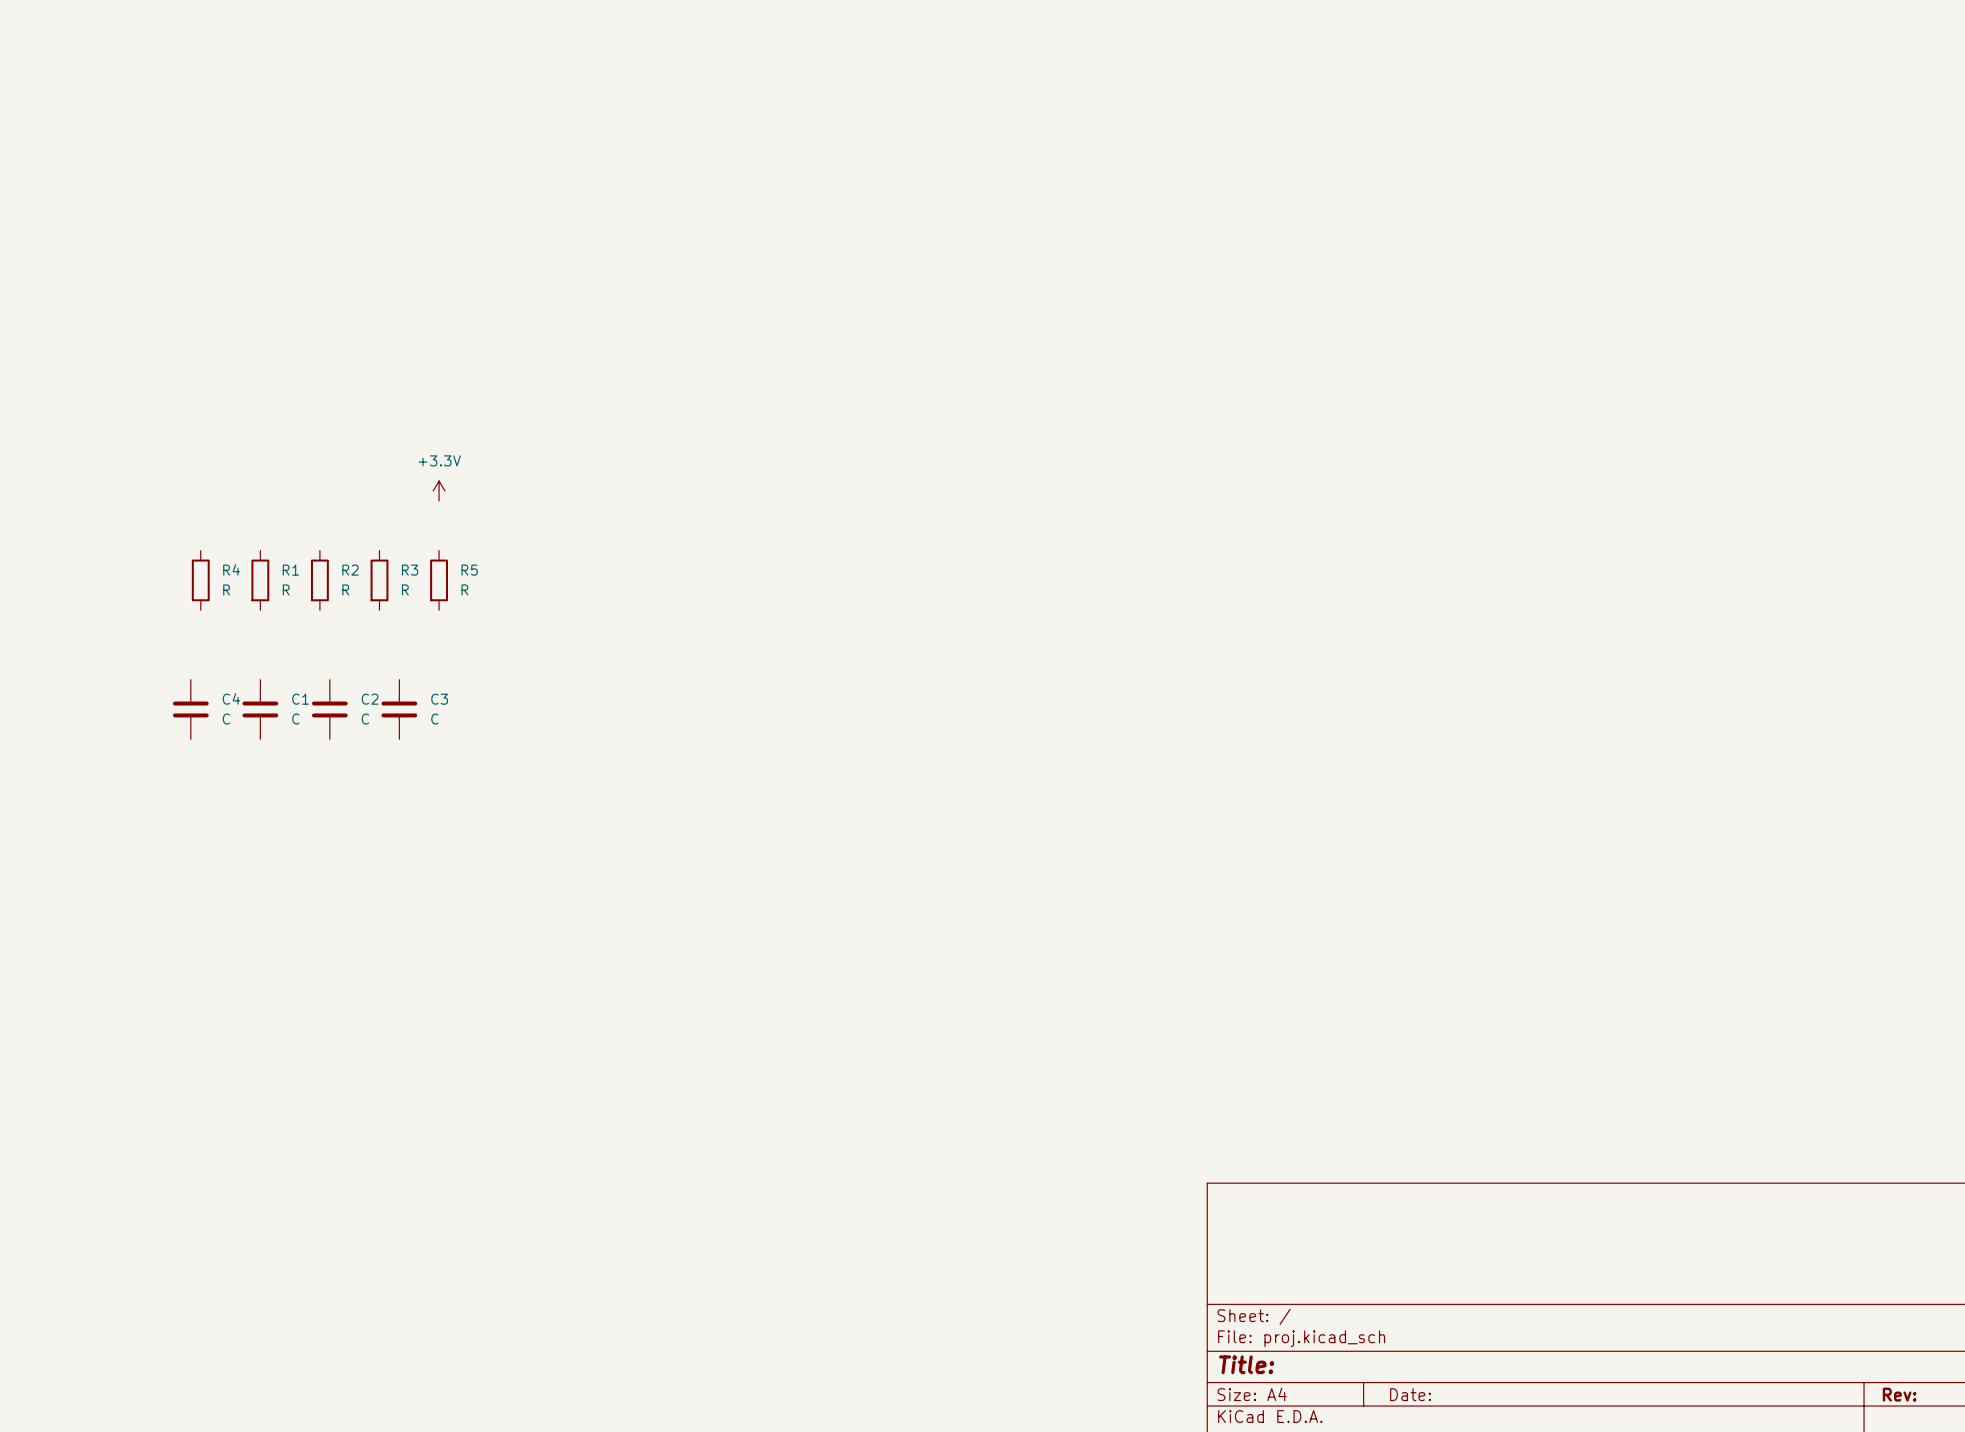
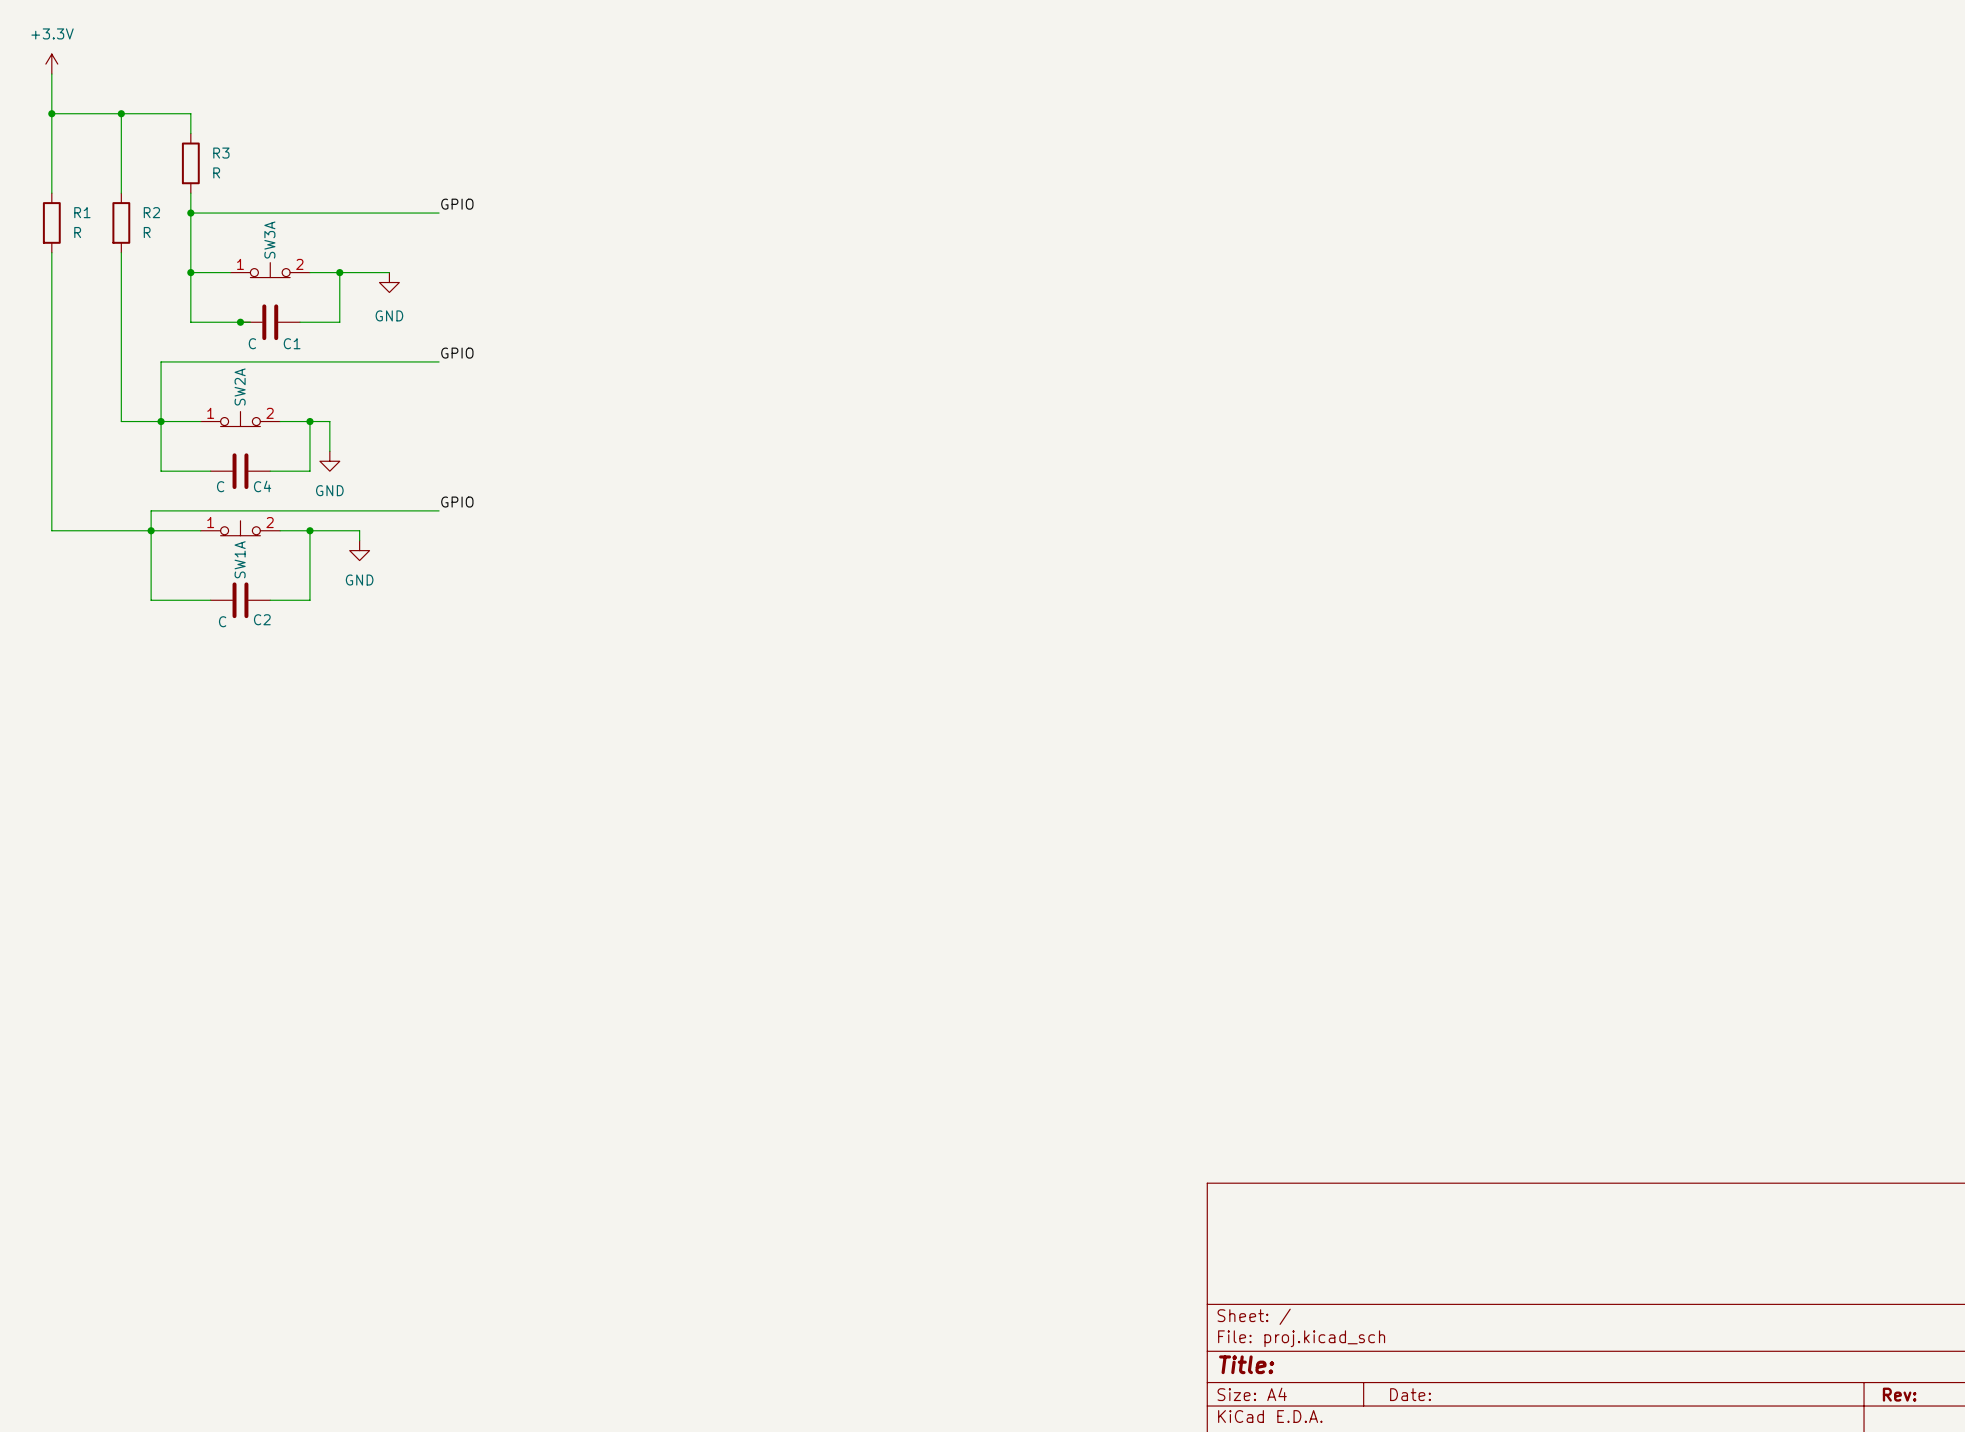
power symbol: none -> +3.3V (51, 64)
wire: none -> (51, 74) (51, 193)
wire: none -> (51, 113) (190, 113) (190, 133)
junction: none -> (51, 113)
wire: none -> (121, 113) (121, 193)
junction: none -> (121, 113)
wire: none -> (190, 193) (190, 322) (250, 322)
label: none -> GPIO (457, 204)
wire: none -> (190, 213) (439, 213)
junction: none -> (190, 213)
wire: none -> (51, 252) (51, 530) (200, 530)
wire: none -> (121, 252) (121, 421) (200, 421)
SW3A: none -> (270, 270)
wire: none -> (190, 272) (230, 272)
junction: none -> (190, 272)
wire: none -> (309, 272) (389, 272)
wire: none -> (339, 272) (339, 322) (300, 322)
junction: none -> (339, 272)
power symbol: none -> GND (389, 282)
junction: none -> (240, 322)
label: none -> GPIO (457, 353)
wire: none -> (439, 361) (161, 361) (161, 471) (210, 471)
SW2A: none -> (240, 419)
junction: none -> (161, 421)
wire: none -> (280, 421) (329, 421) (329, 451)
wire: none -> (309, 421) (309, 471) (270, 471)
junction: none -> (309, 421)
power symbol: none -> GND (329, 461)
power symbol: +3.3V (439, 491) -> none
label: none -> GPIO (457, 502)
wire: none -> (439, 510) (151, 510) (151, 600) (210, 600)
SW1A: none -> (240, 528)
junction: none -> (151, 530)
wire: none -> (280, 530) (359, 530) (359, 540)
wire: none -> (309, 530) (309, 600) (270, 600)
junction: none -> (309, 530)
power symbol: none -> GND (359, 550)
R4: R (200, 580) -> none
R1 position: (260, 580) -> (51, 222)
R2 position: (319, 580) -> (121, 222)
R3 position: (379, 580) -> (190, 163)
R5: R (439, 580) -> none
C4 name position: C4 (231, 698) -> C4 (262, 486)
C1 name position: C1 (300, 699) -> C1 (292, 343)
C2 name position: C2 (370, 699) -> C2 (262, 619)
C4 rotation: 0° (190, 709) -> 90° clockwise (240, 471)
C4 position: (190, 709) -> (240, 471)
C1 rotation: 0° (260, 709) -> 90° clockwise (270, 322)
C1 position: (260, 709) -> (270, 322)
C2 rotation: 0° (329, 709) -> 90° clockwise (240, 600)
C2 position: (329, 709) -> (240, 600)
C3: C (399, 709) -> none
C4 value position: C (226, 719) -> C (220, 486)
C1 value position: C (295, 719) -> C (252, 343)
C2 value position: C (365, 719) -> C (222, 621)

